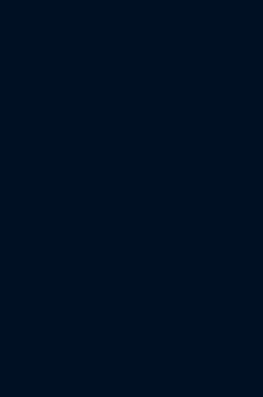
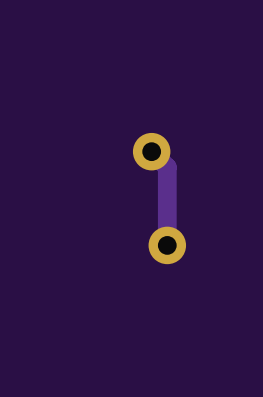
track: none -> (151, 151) (167, 167) (167, 245)
via: none -> (151, 151)
via: none -> (167, 245)

